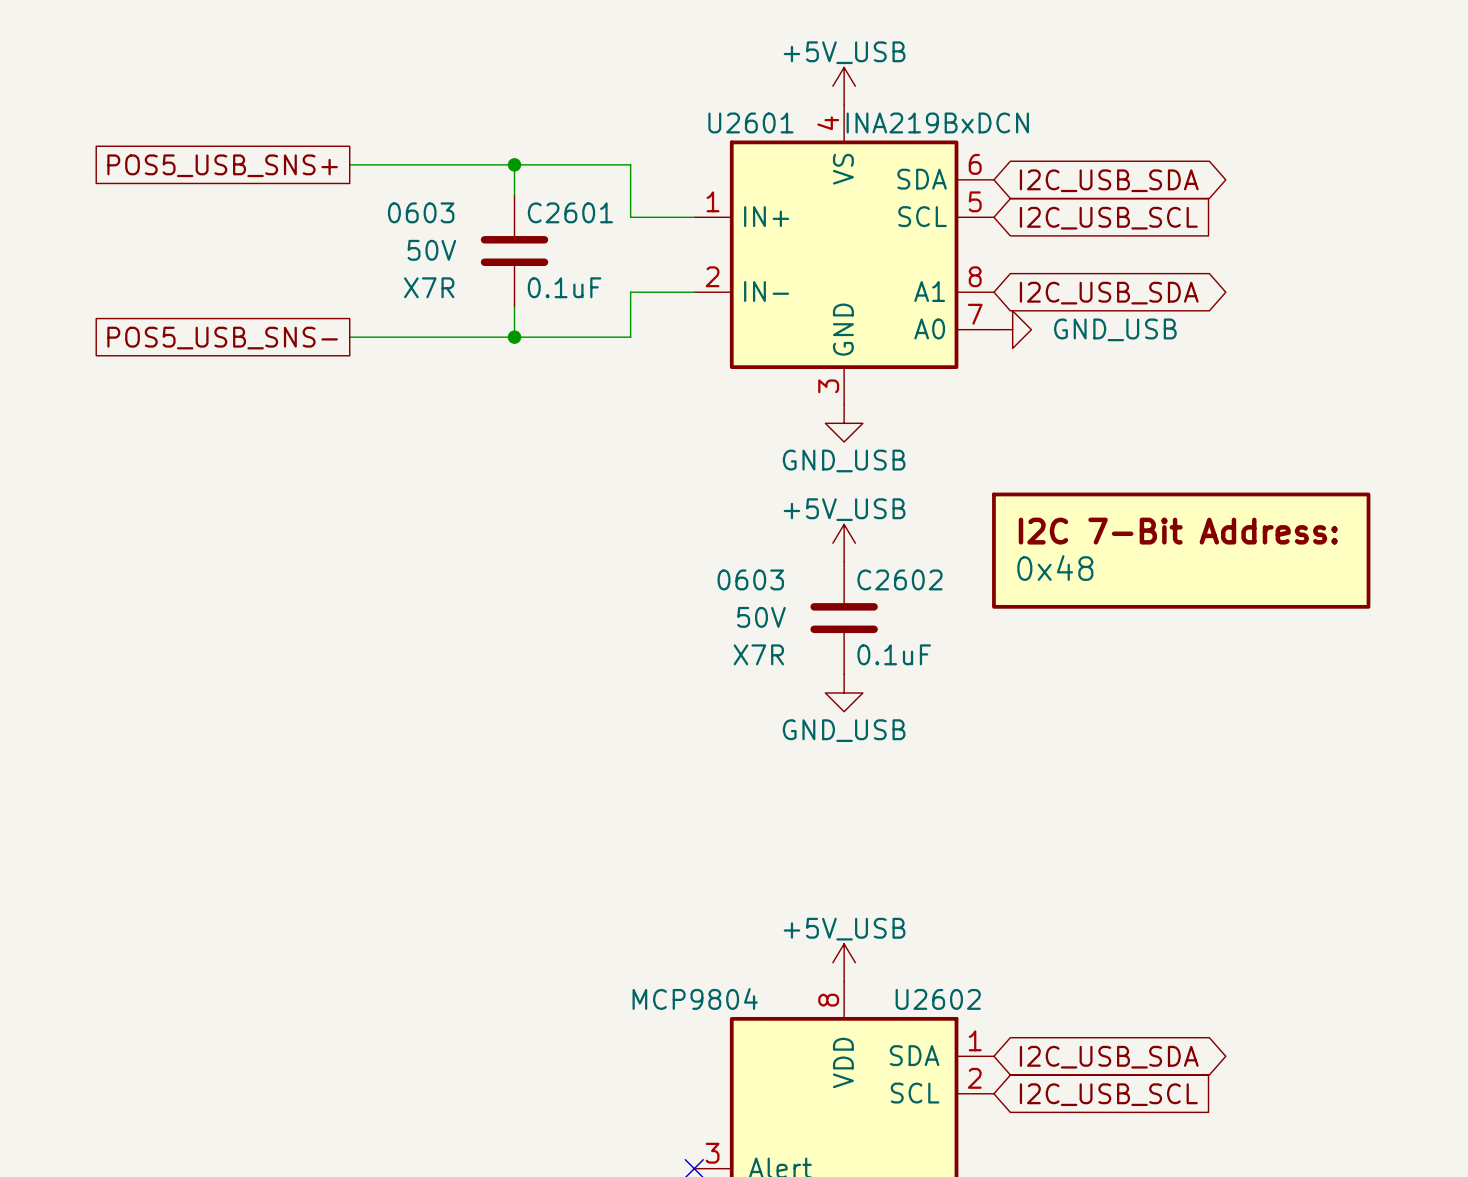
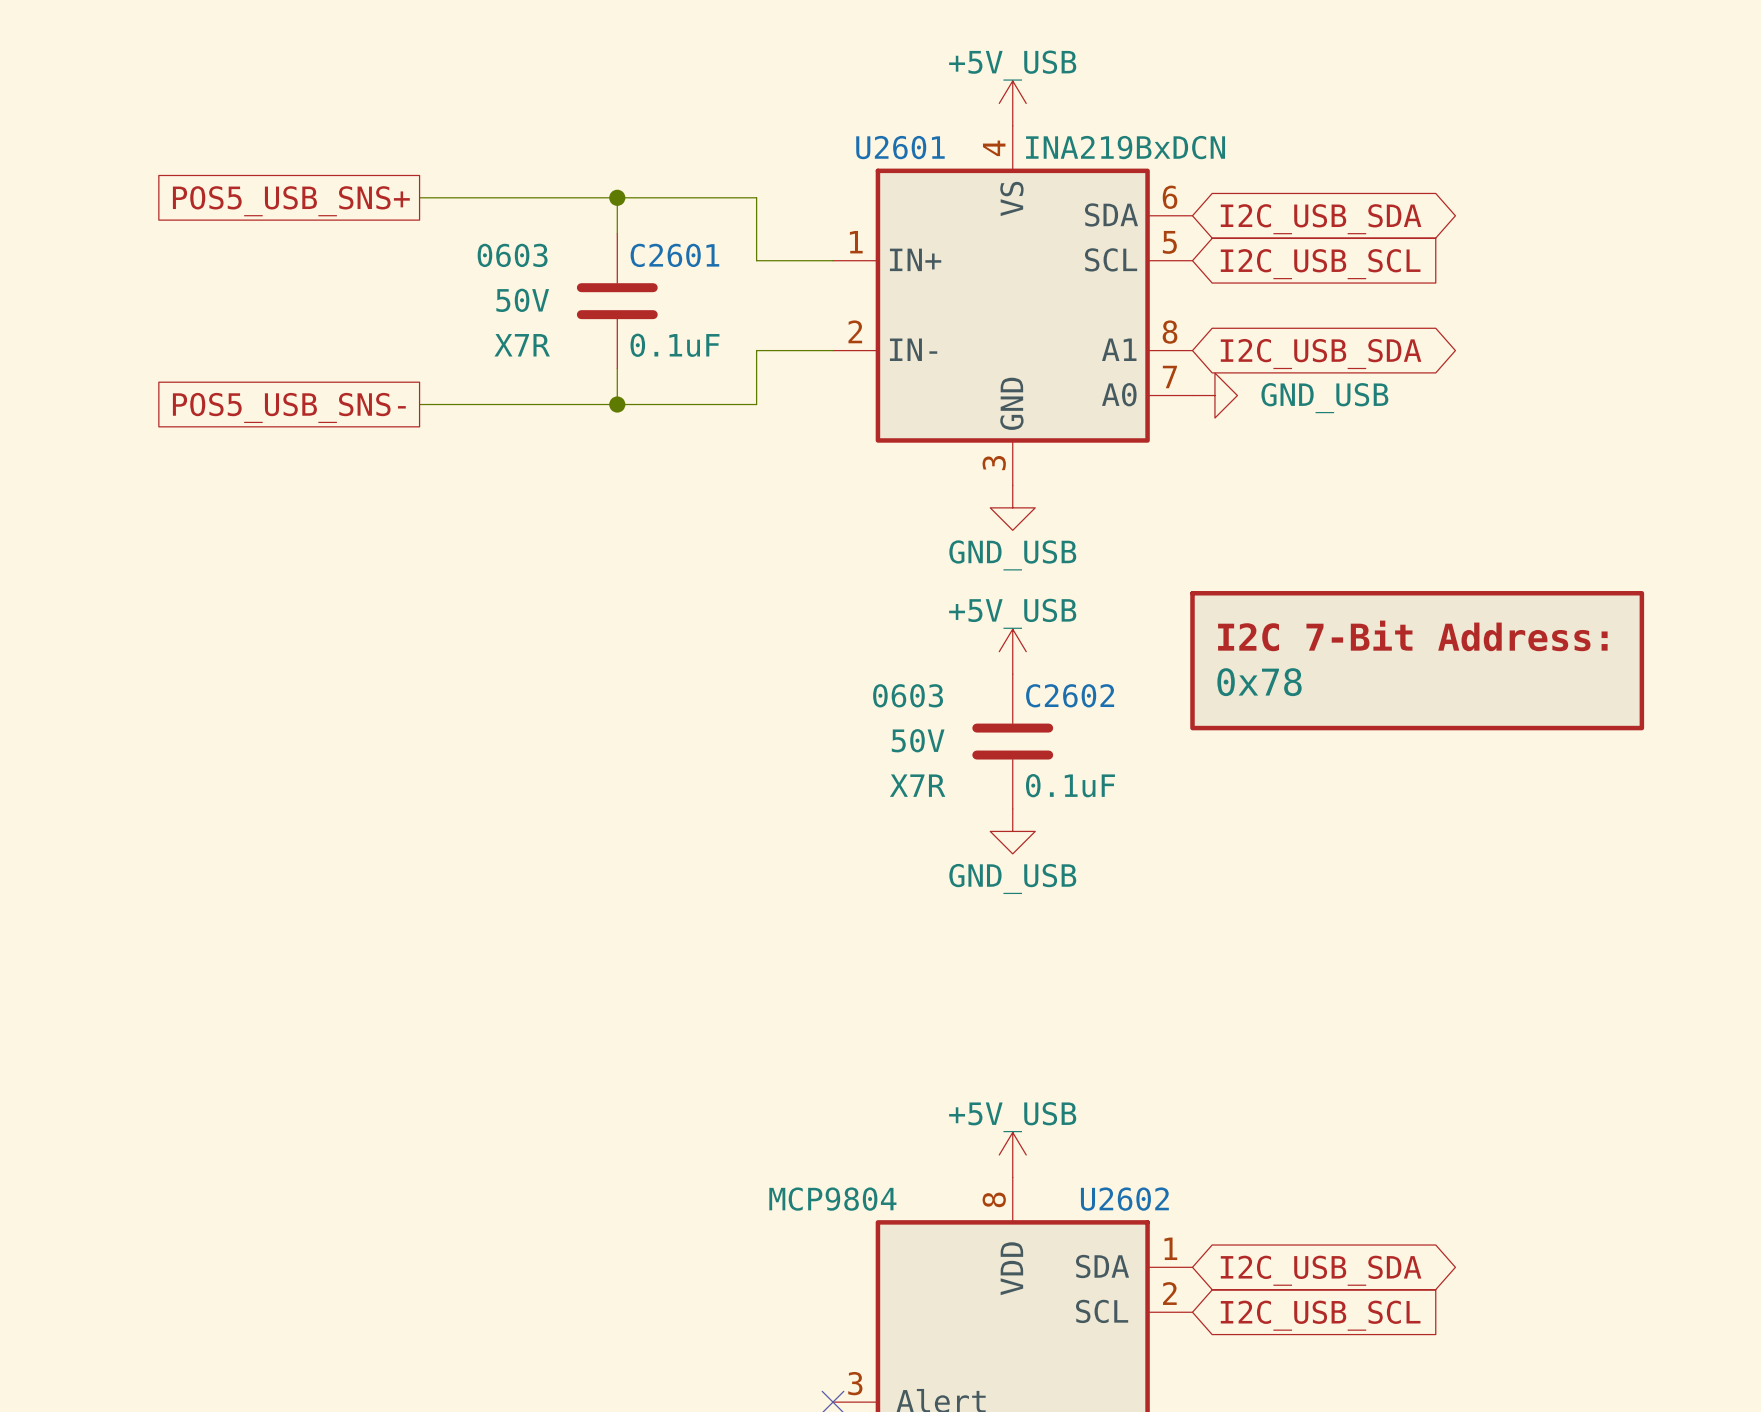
part value: 0x48 (1055, 568) -> 0x78 (1259, 682)

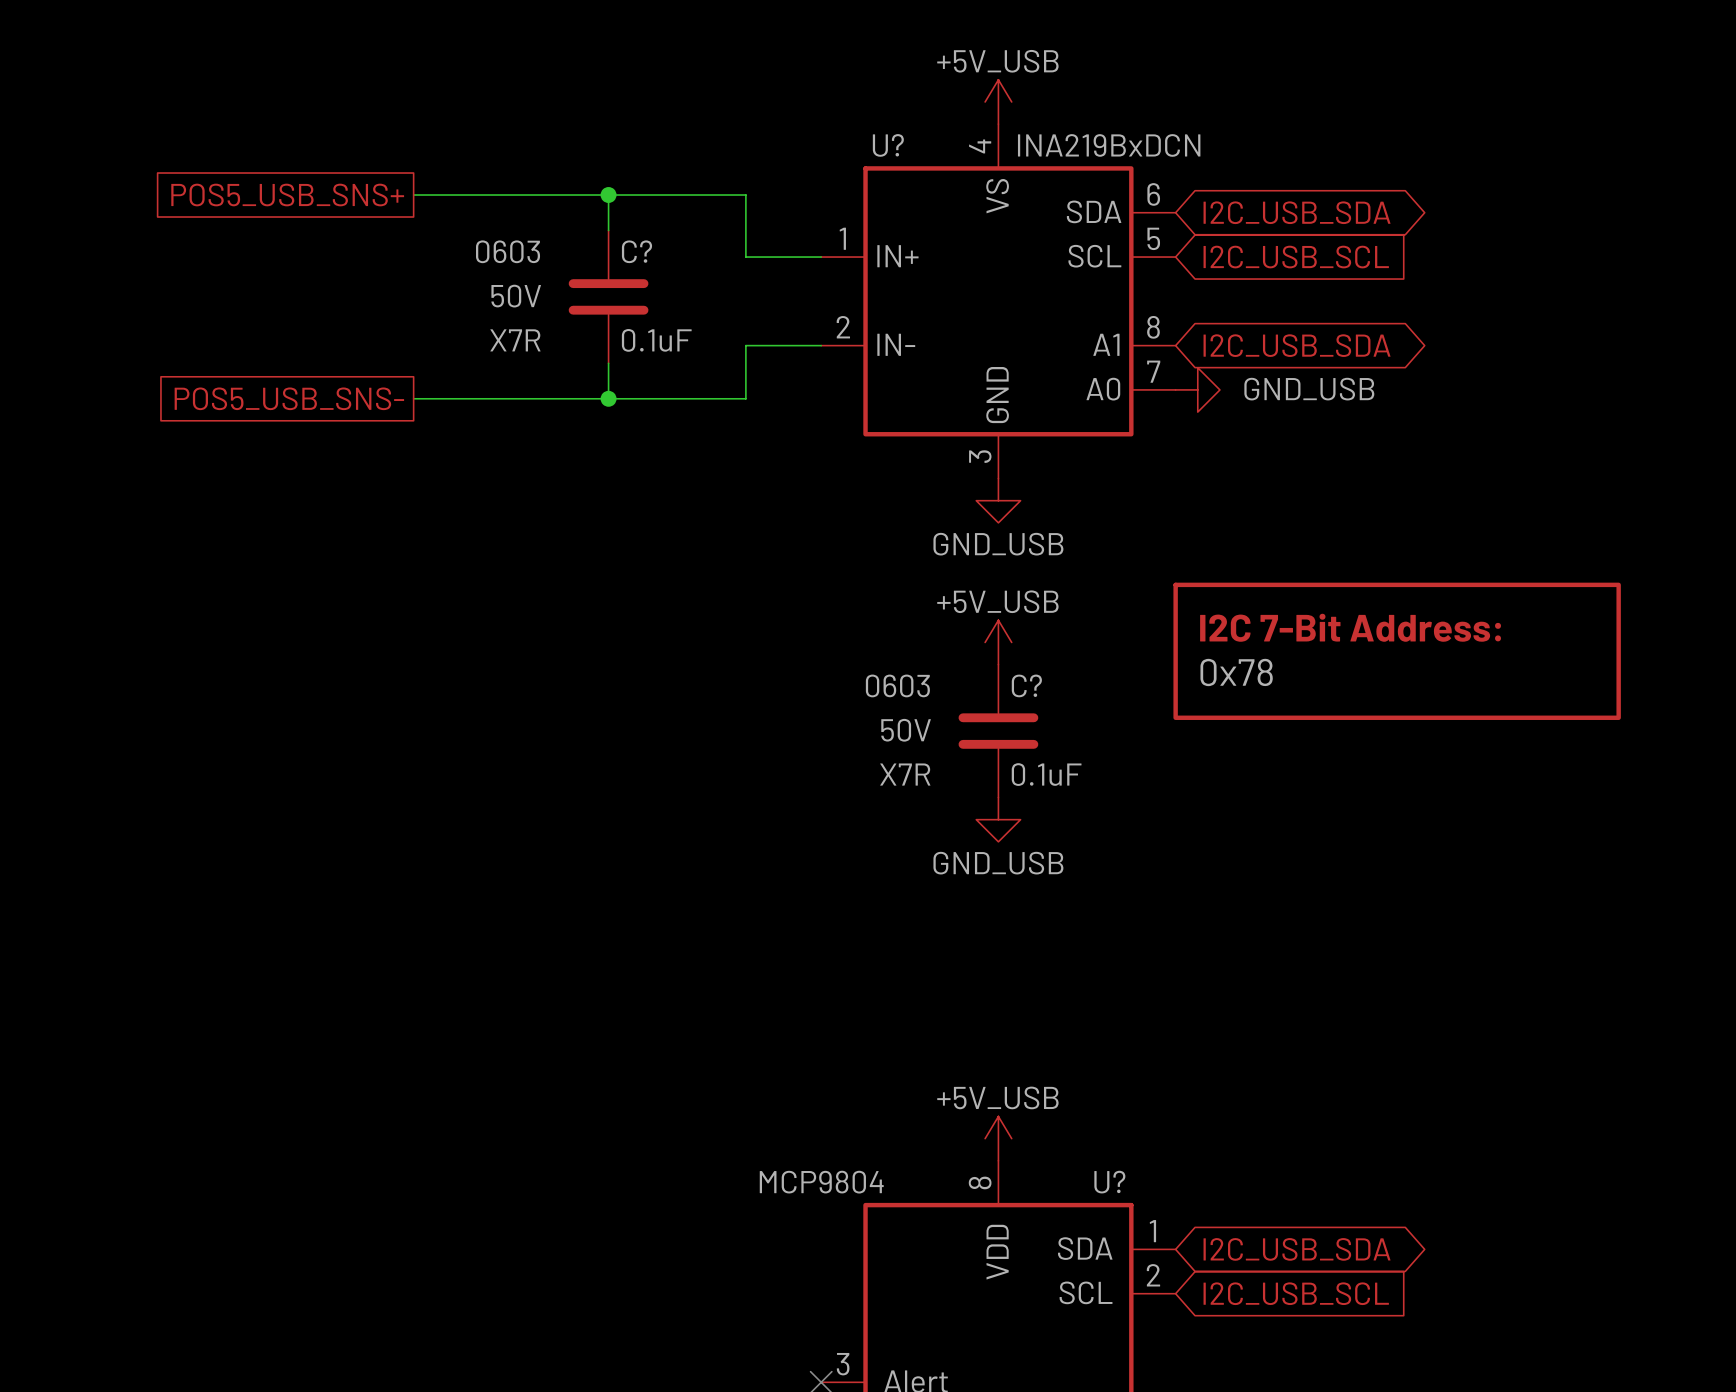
U2601 name: U2601 (900, 147) -> U? (888, 145)
C2601 name: C2601 (674, 255) -> C? (636, 251)
C2602 name: C2602 (1070, 695) -> C? (1026, 685)
U2602 name: U2602 (1124, 1199) -> U? (1109, 1182)

